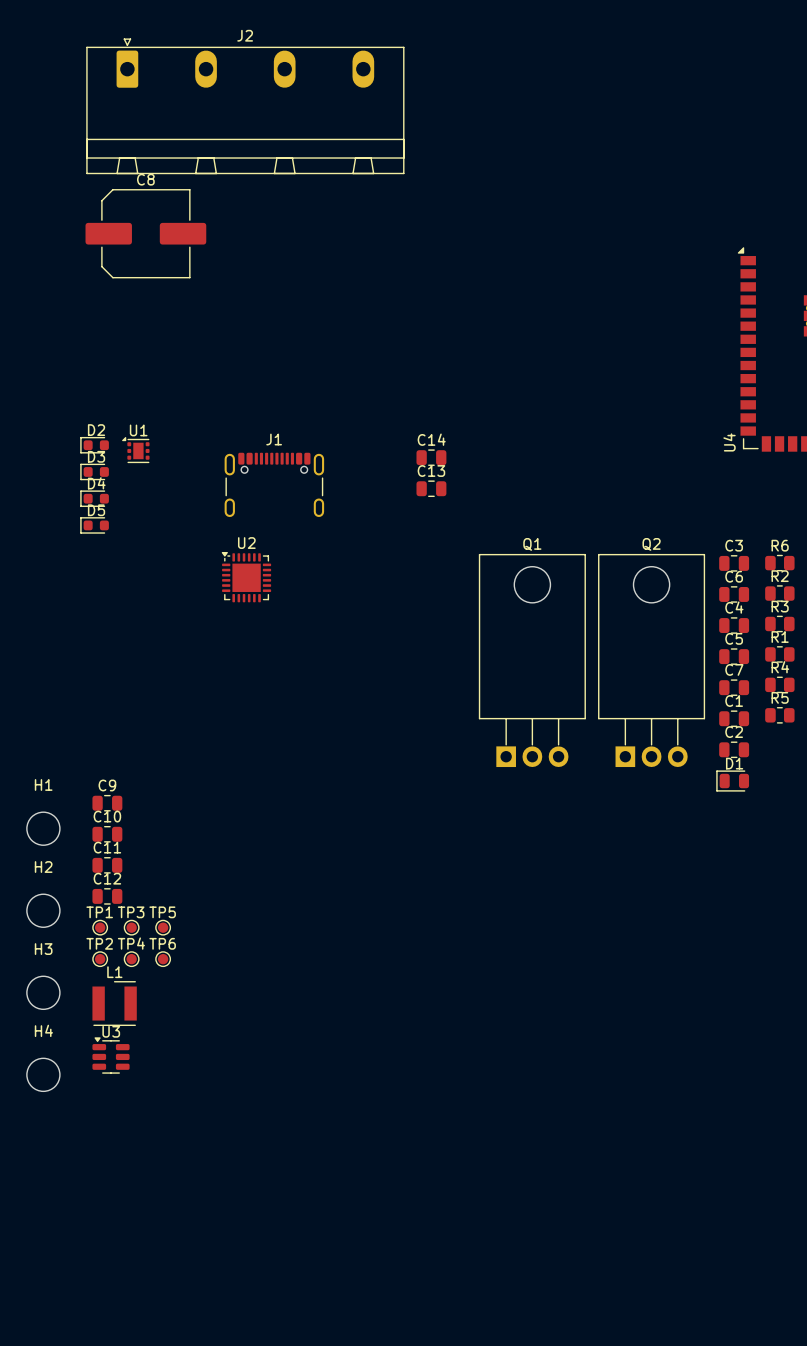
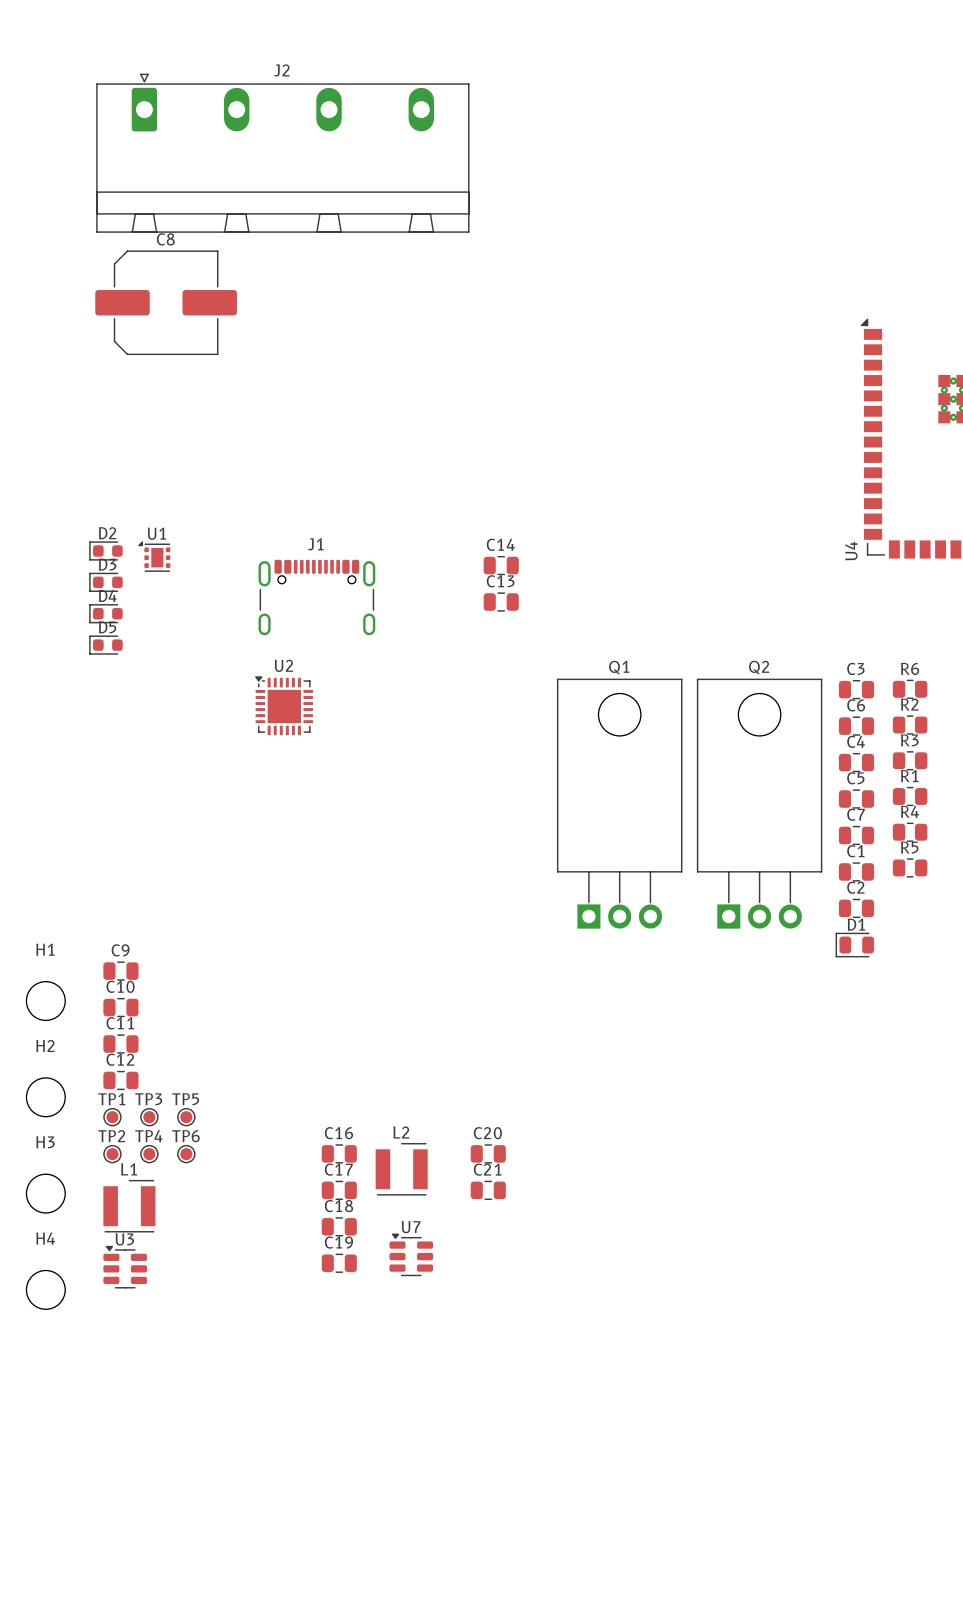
C16: none -> (339, 1153)
C20: none -> (488, 1153)
L2: none -> (401, 1169)
C17: none -> (339, 1190)
C21: none -> (488, 1190)
C18: none -> (339, 1226)
U7: none -> (411, 1254)
C19: none -> (339, 1263)

